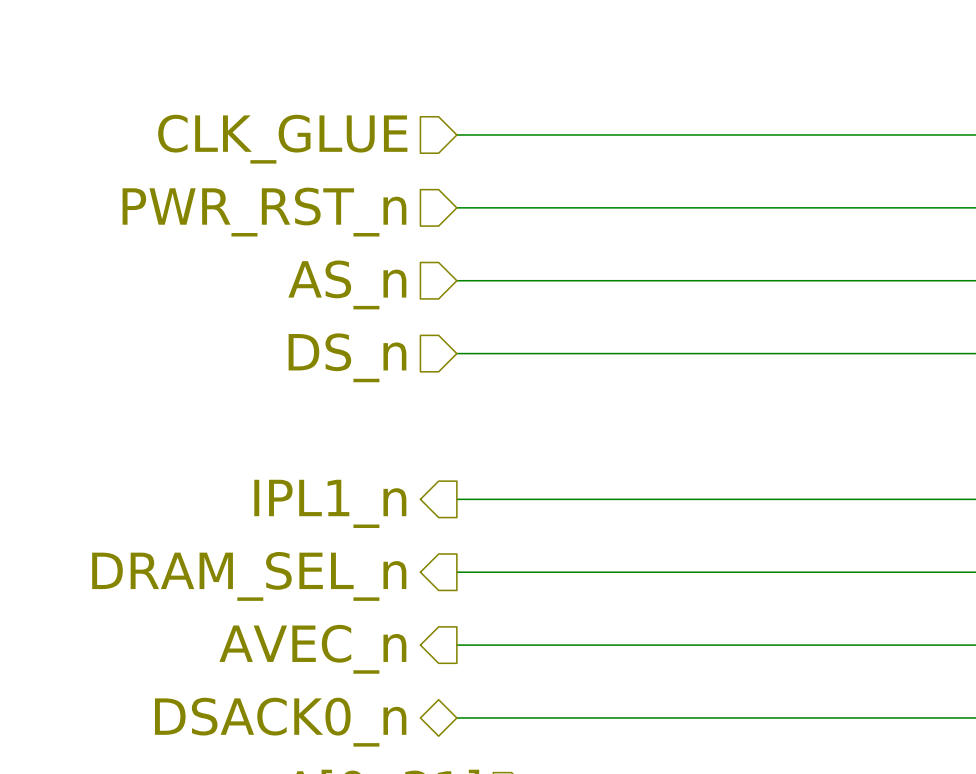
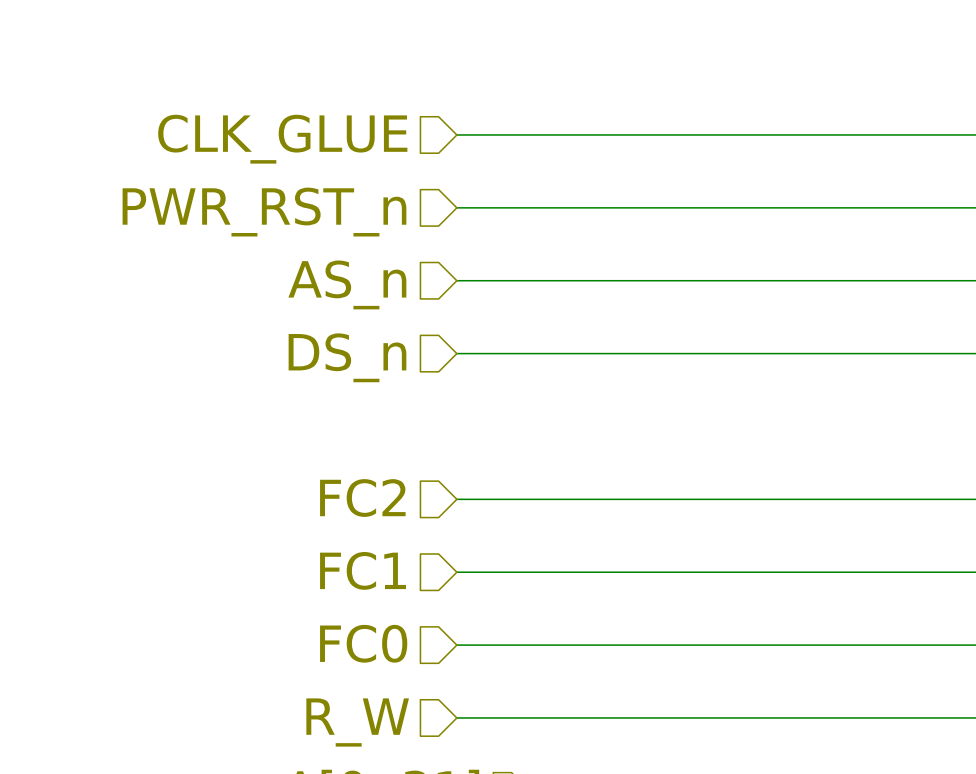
hierarchical label shape: output (330, 503) -> input (362, 498)
hierarchical label: IPL1_n (330, 503) -> FC2 (362, 498)
hierarchical label shape: output (249, 576) -> input (363, 570)
hierarchical label: DRAM_SEL_n (249, 576) -> FC1 (363, 570)
hierarchical label shape: output (312, 649) -> input (363, 643)
hierarchical label: AVEC_n (312, 649) -> FC0 (363, 643)
hierarchical label shape: bidirectional (280, 722) -> input (357, 722)
hierarchical label: DSACK0_n (280, 722) -> R_W (357, 722)

